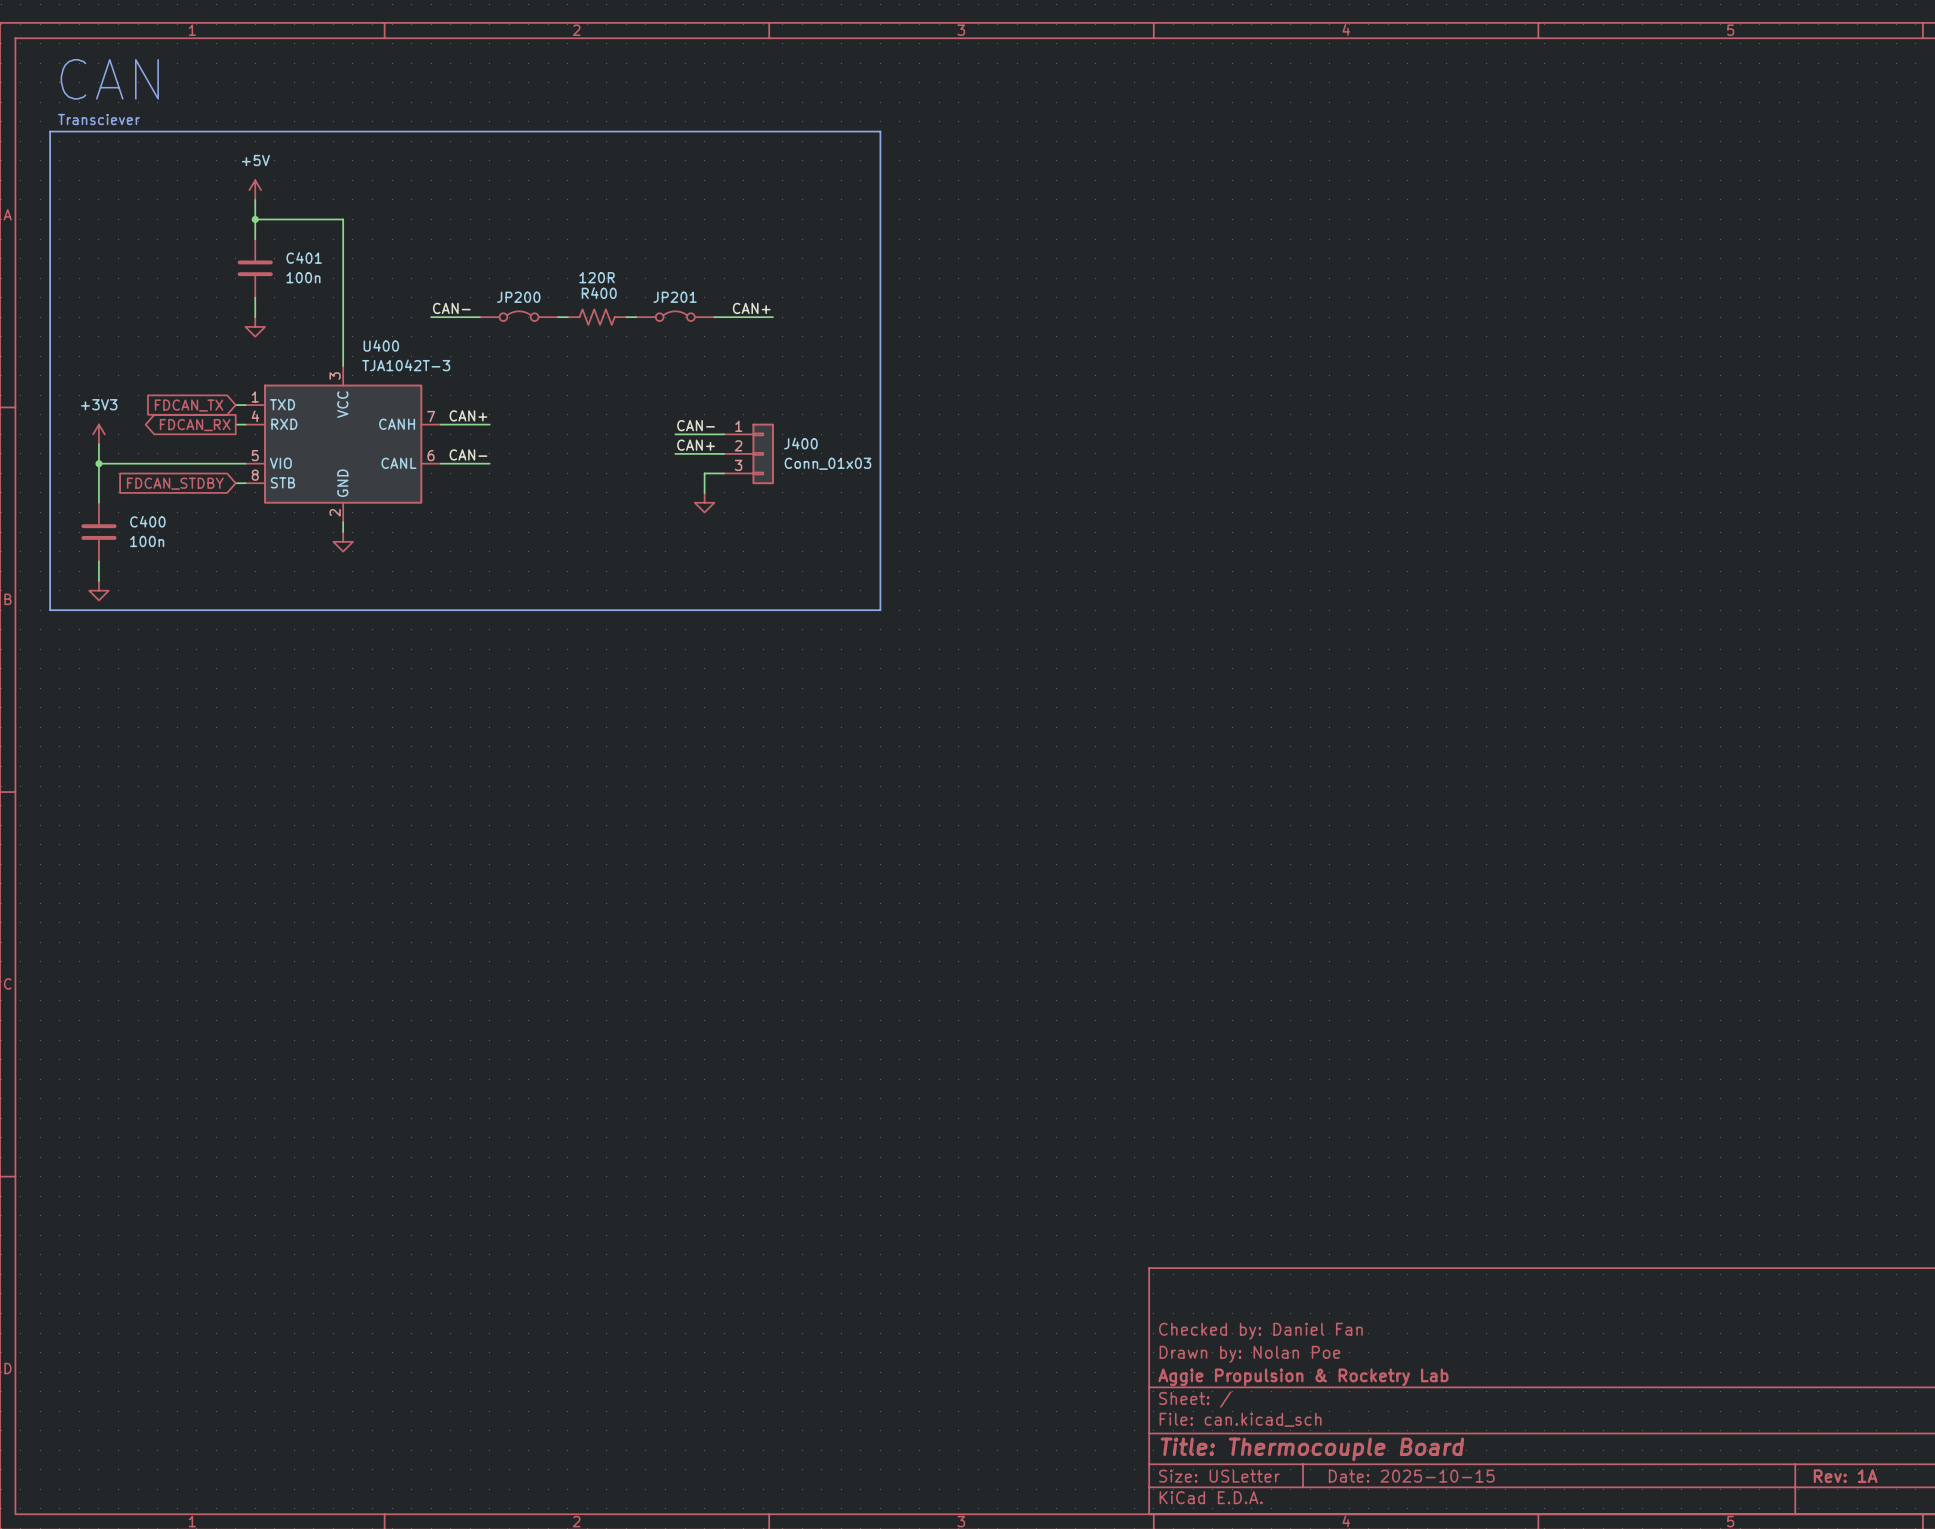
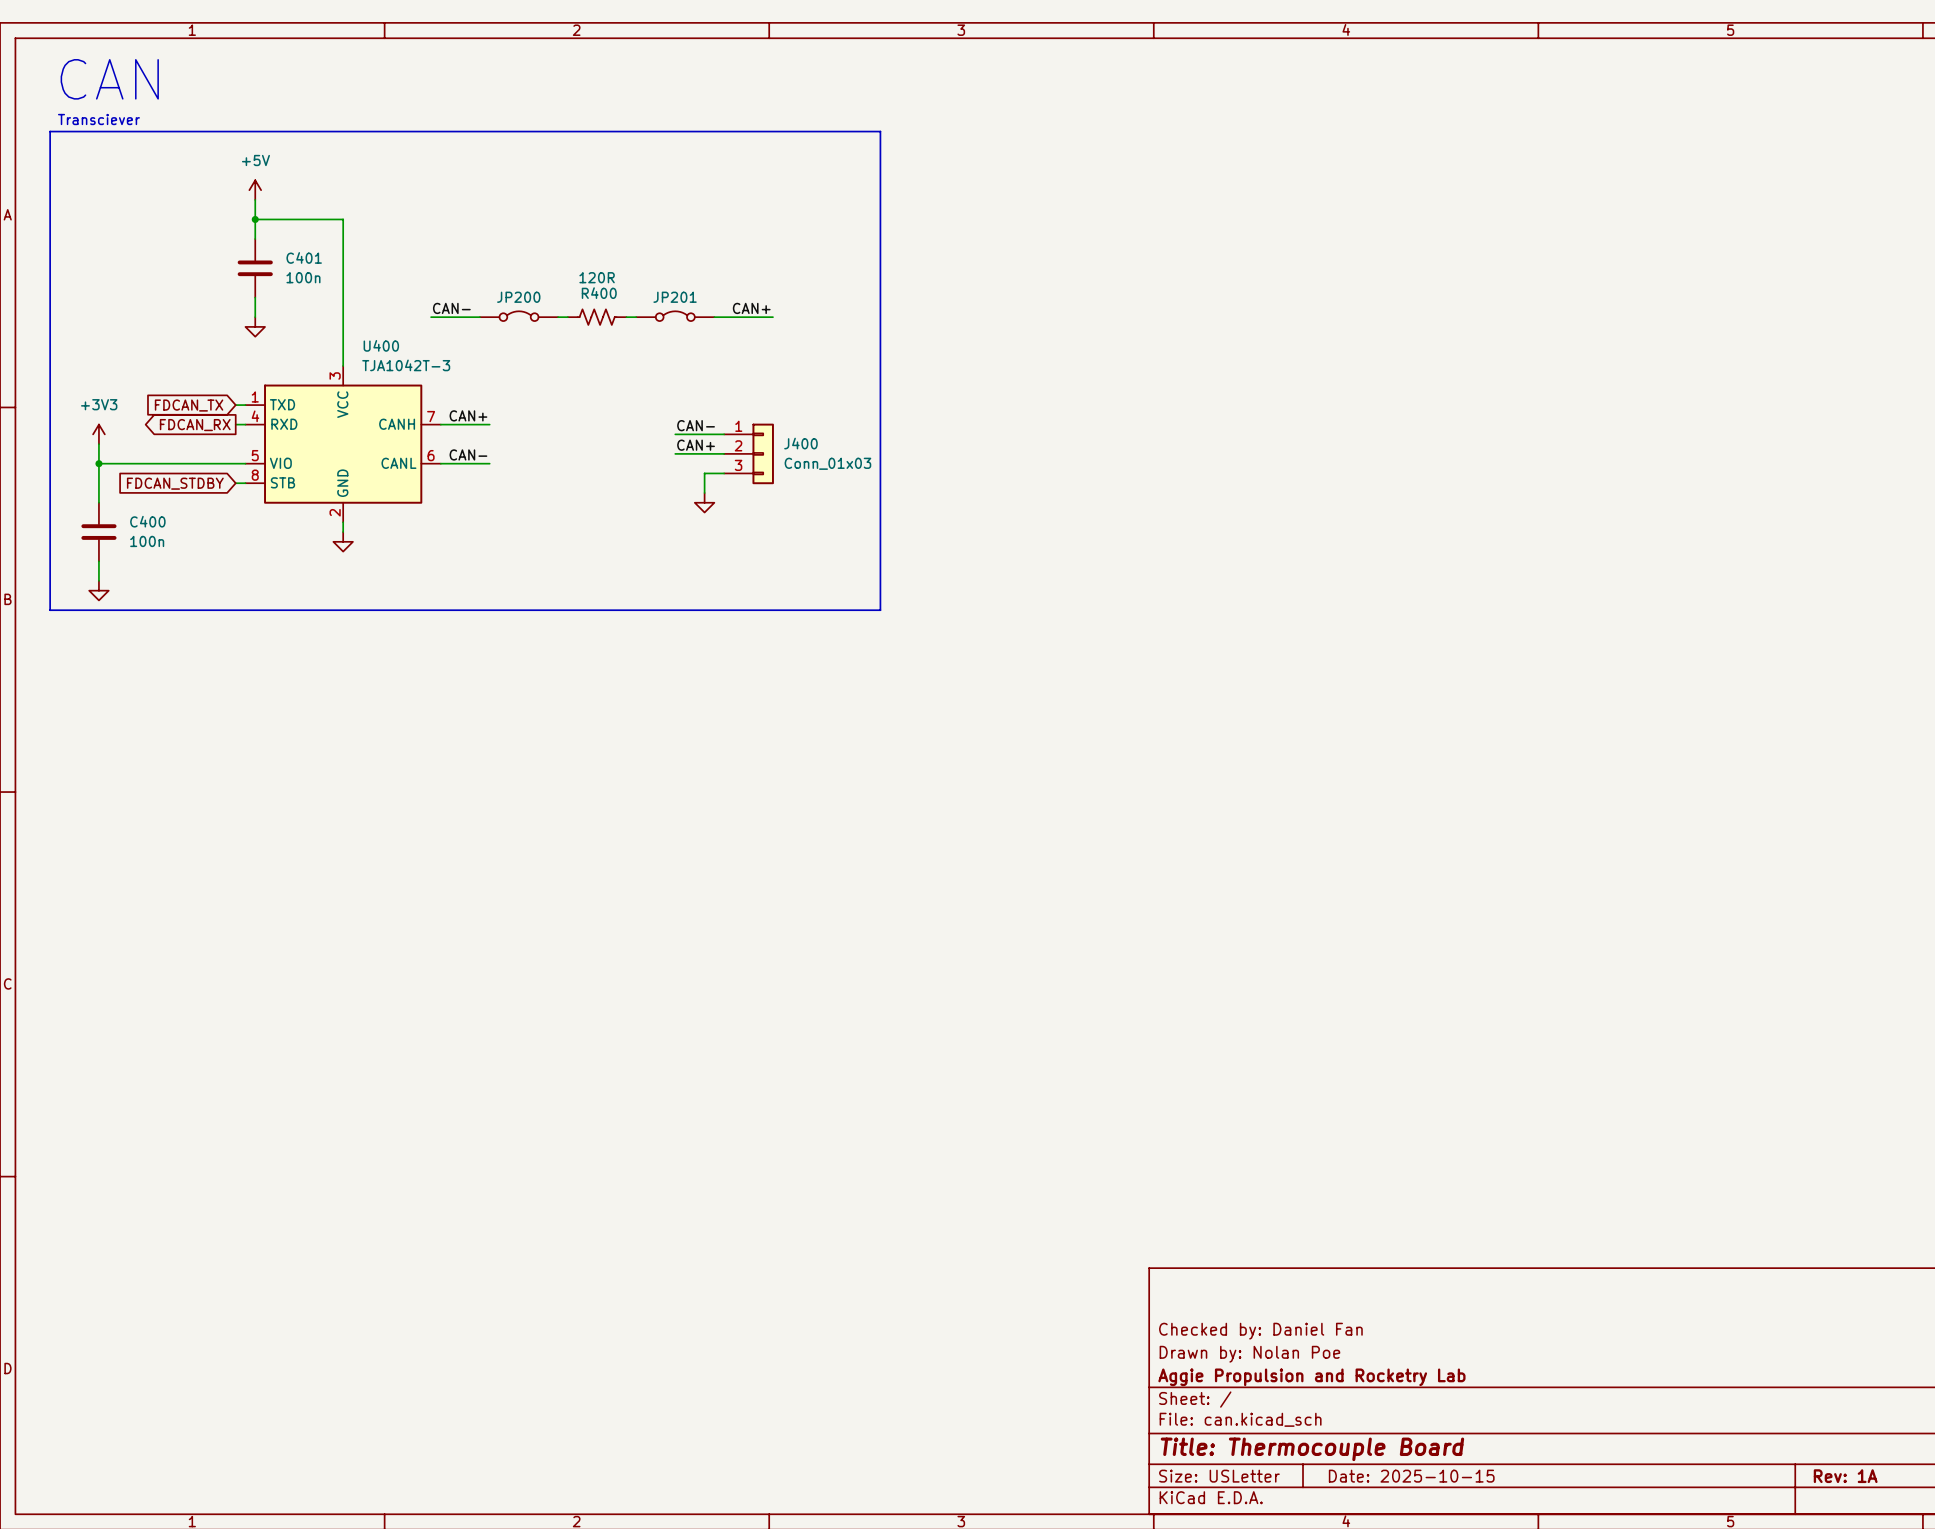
title block: Aggie Propulsion & Rocketry Lab (1303, 1377) -> Aggie Propulsion and Rocketry Lab (1311, 1377)

